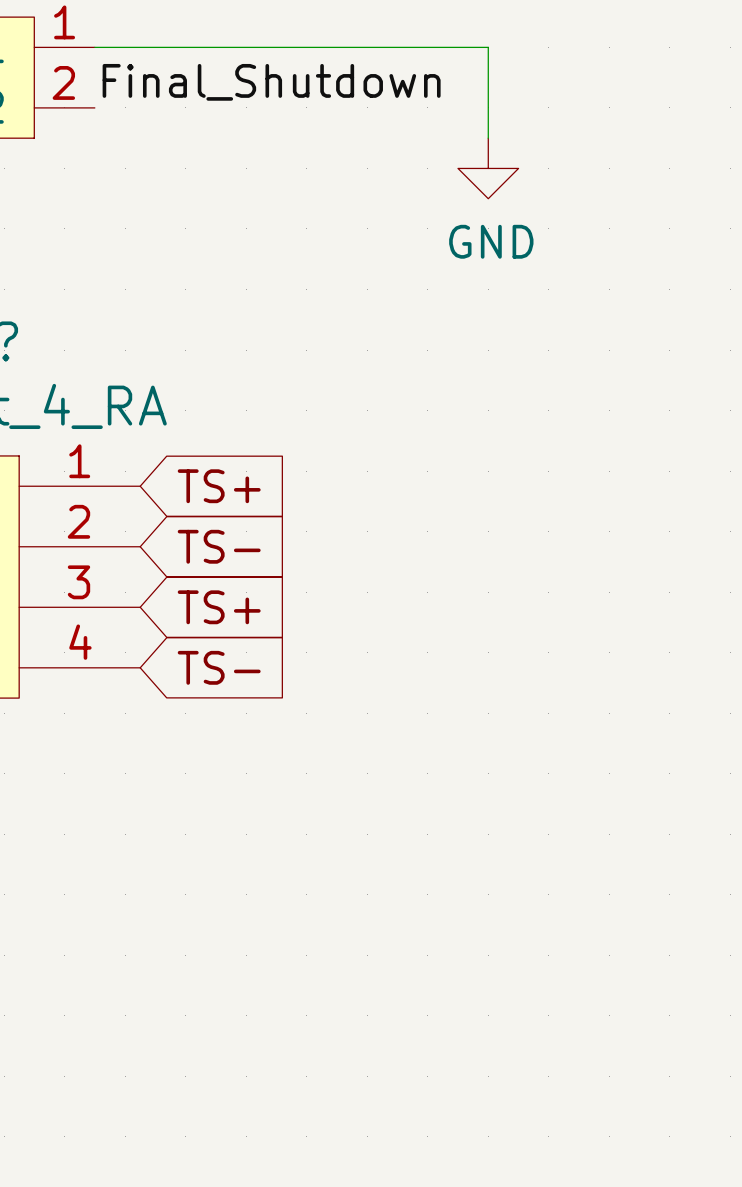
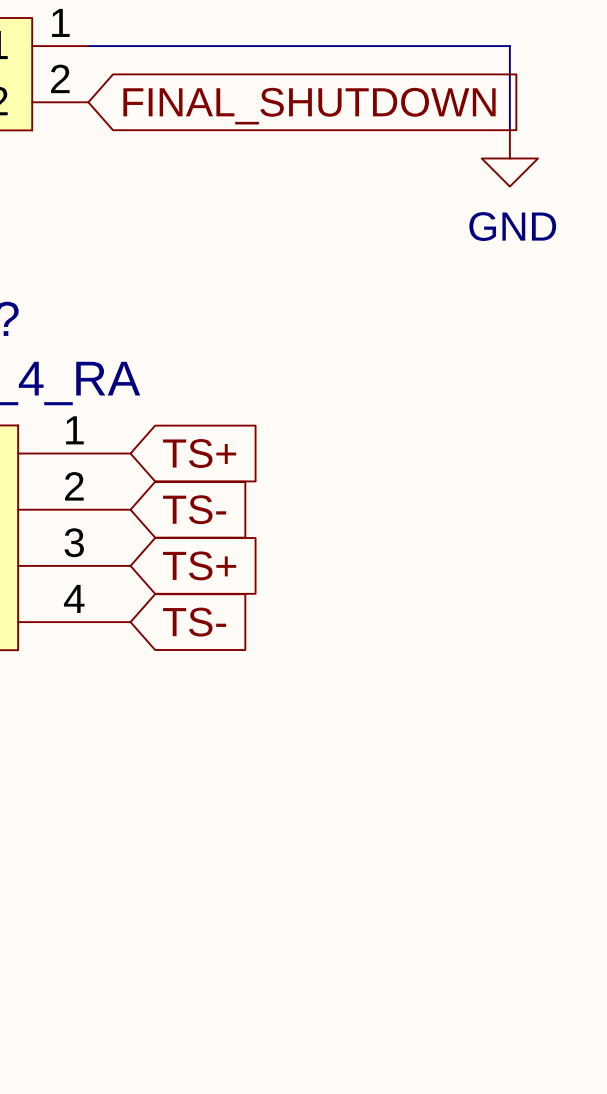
wire: (488, 47) (488, 138) -> (453, 46) (509, 46) (509, 130)
label: Final_Shutdown (271, 82) -> none
global label: none -> FINAL_SHUTDOWN (309, 106)
power symbol position: GND (488, 168) -> GND (509, 158)

